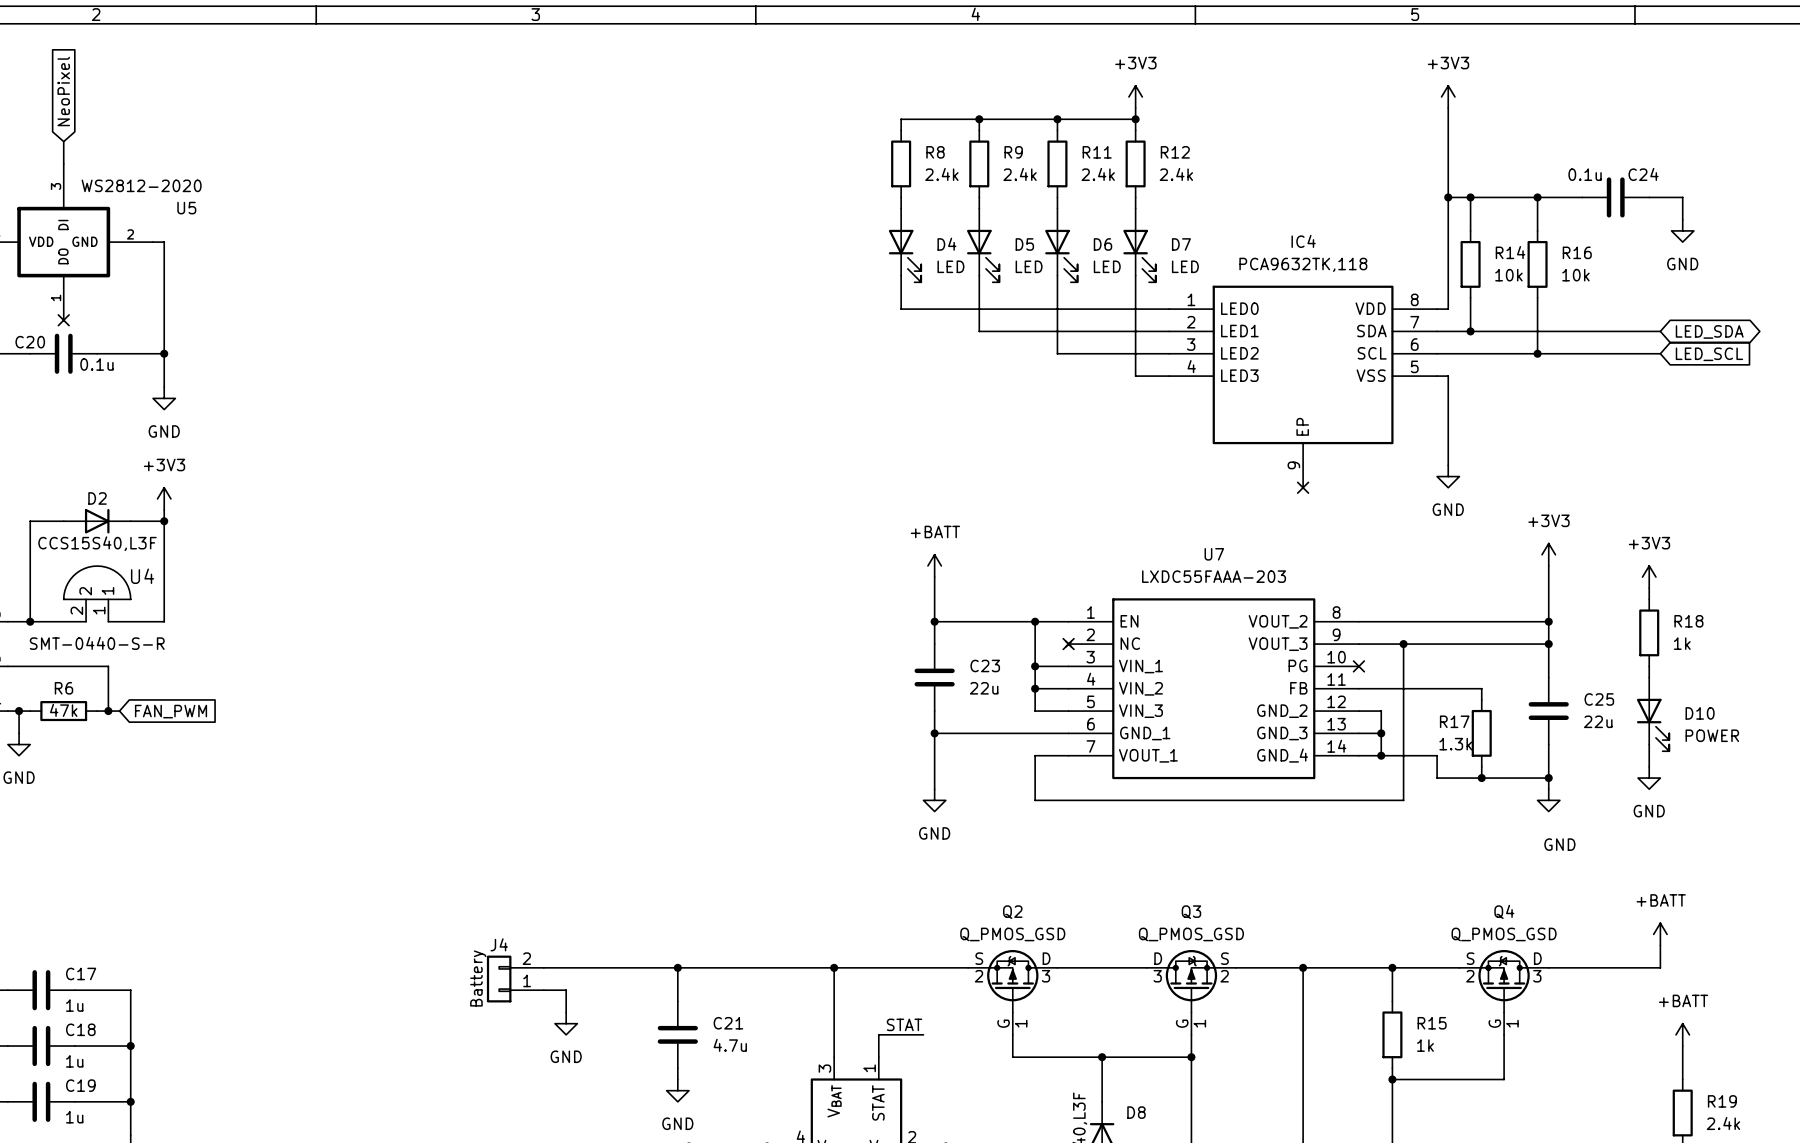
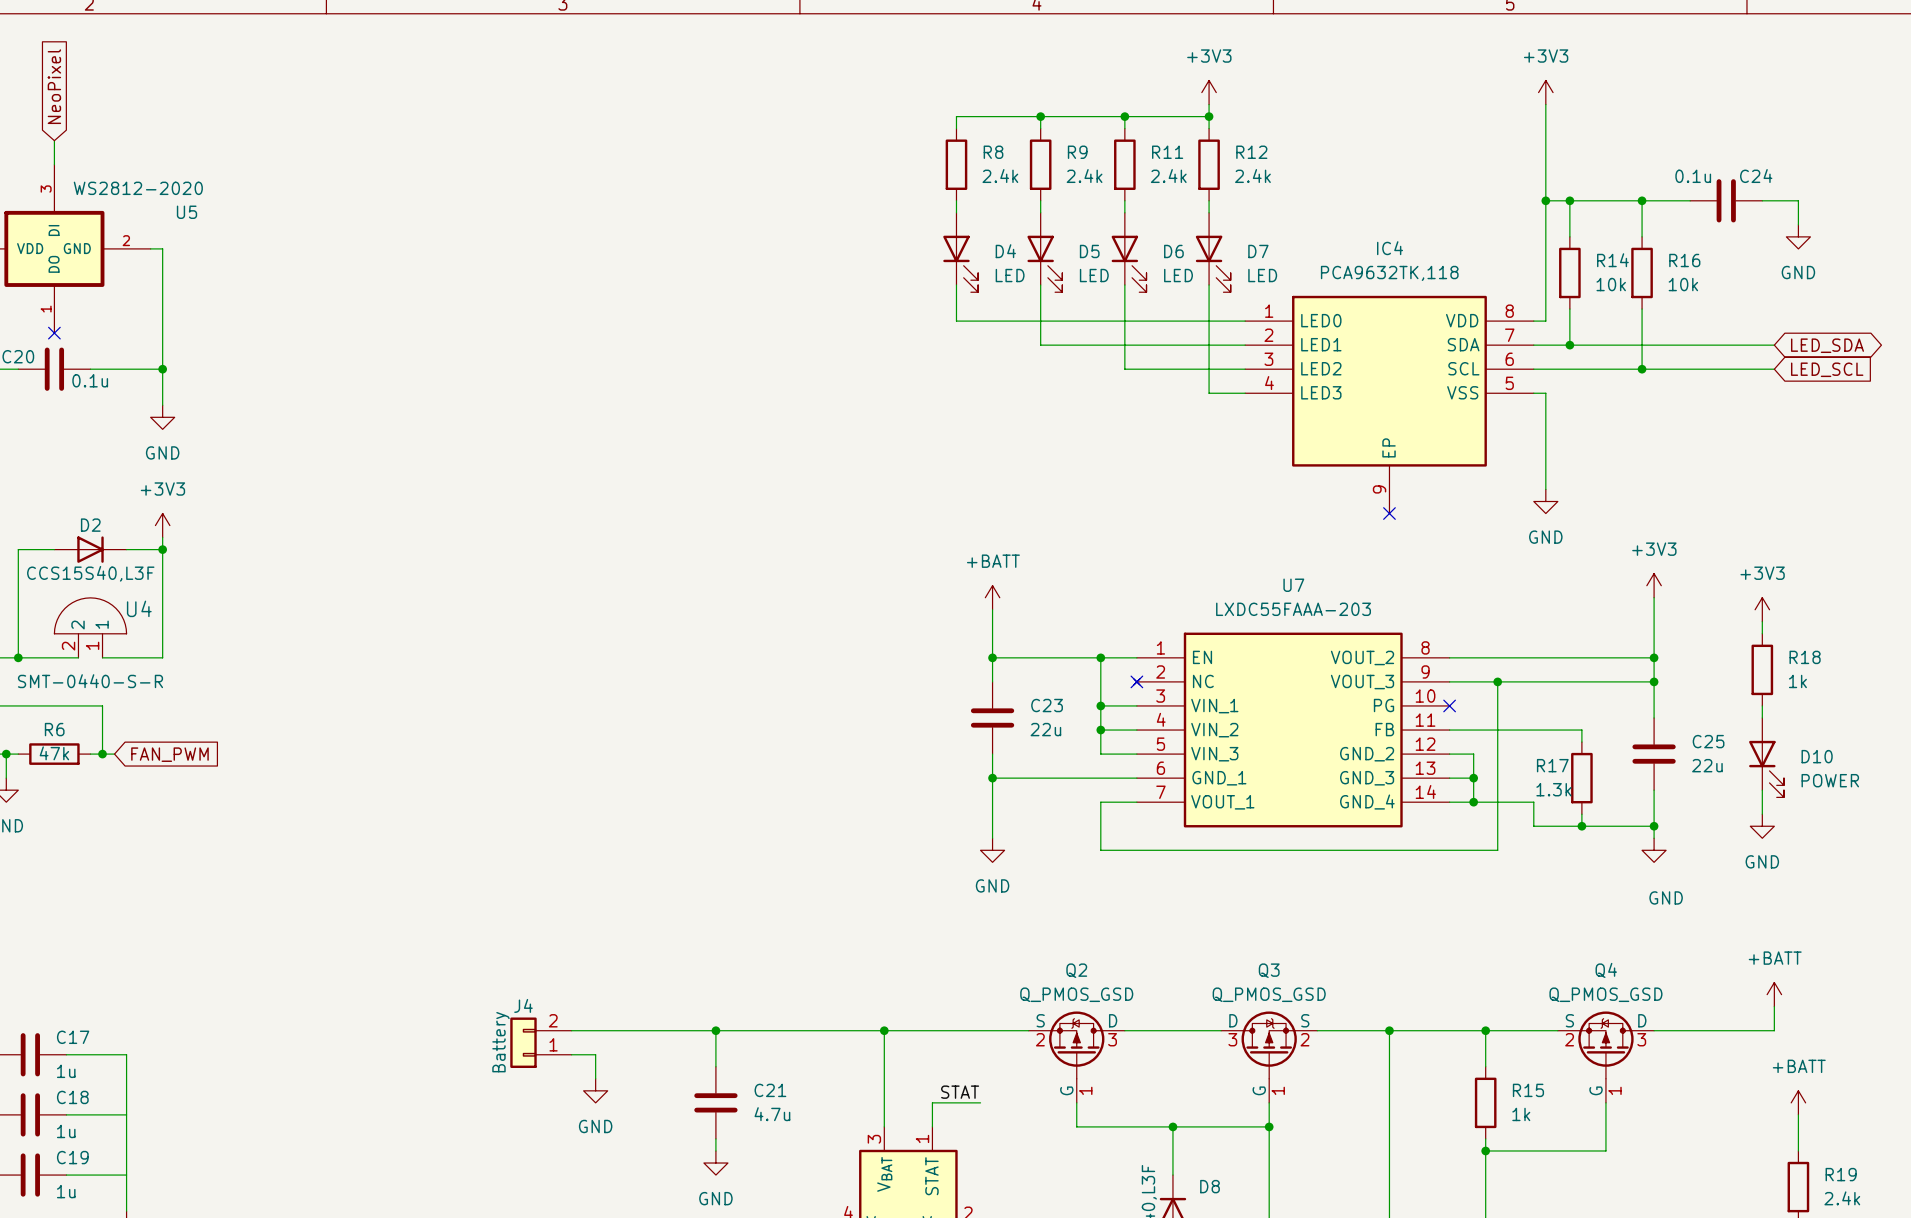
junction: (130, 1046) -> none
junction: (130, 1101) -> none

